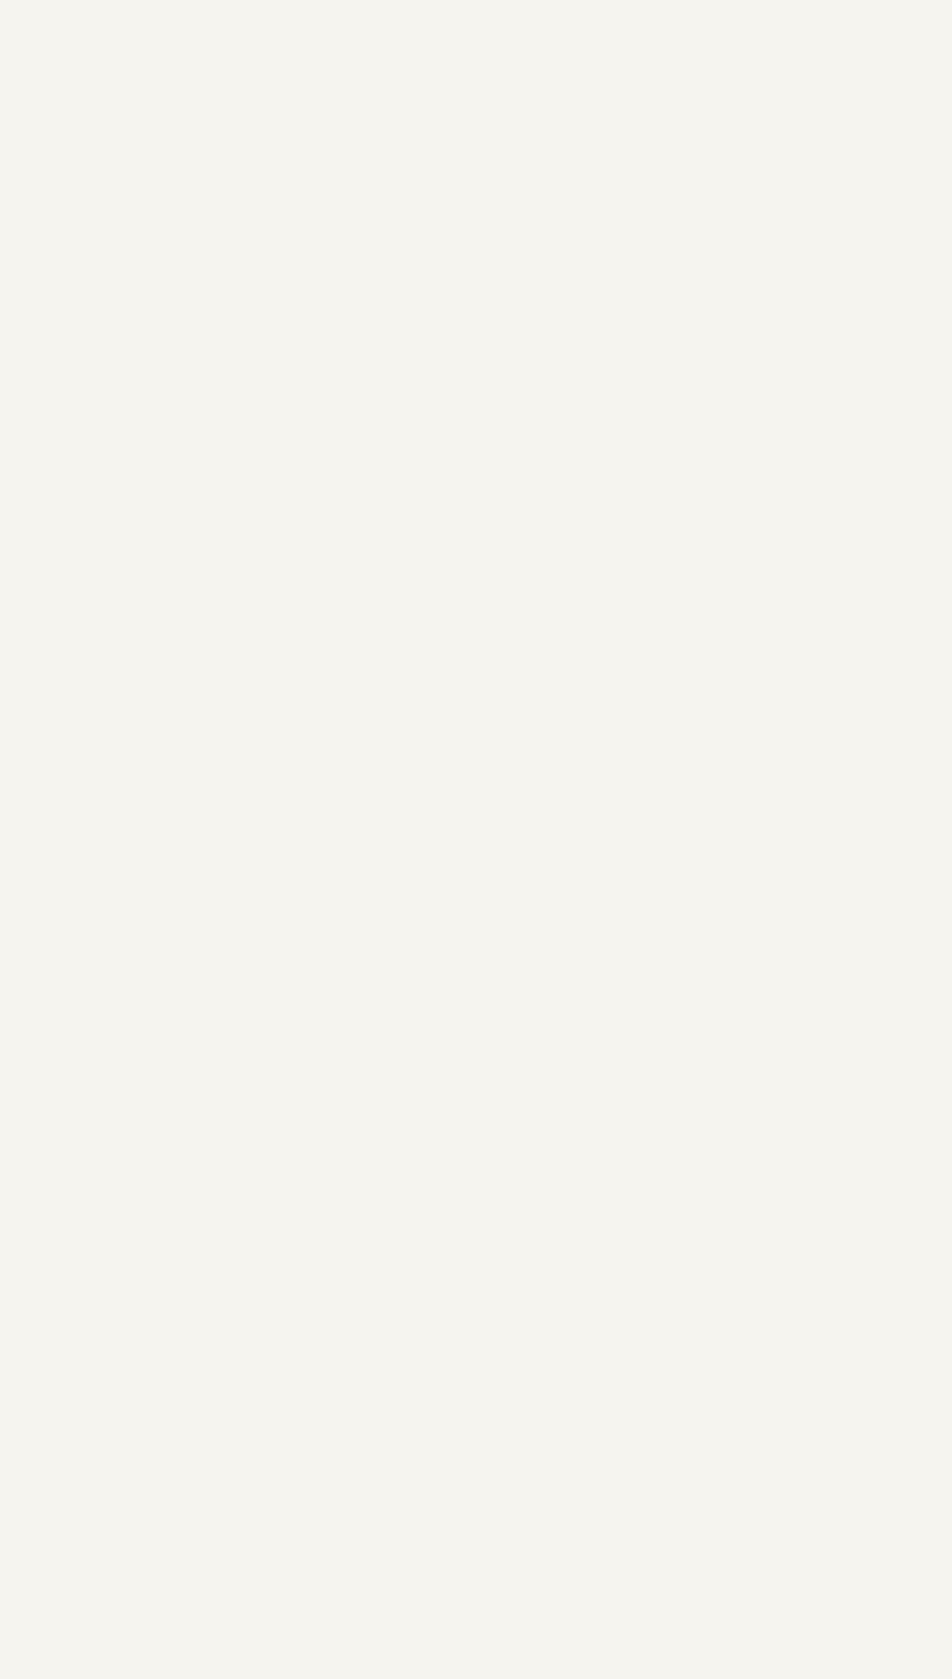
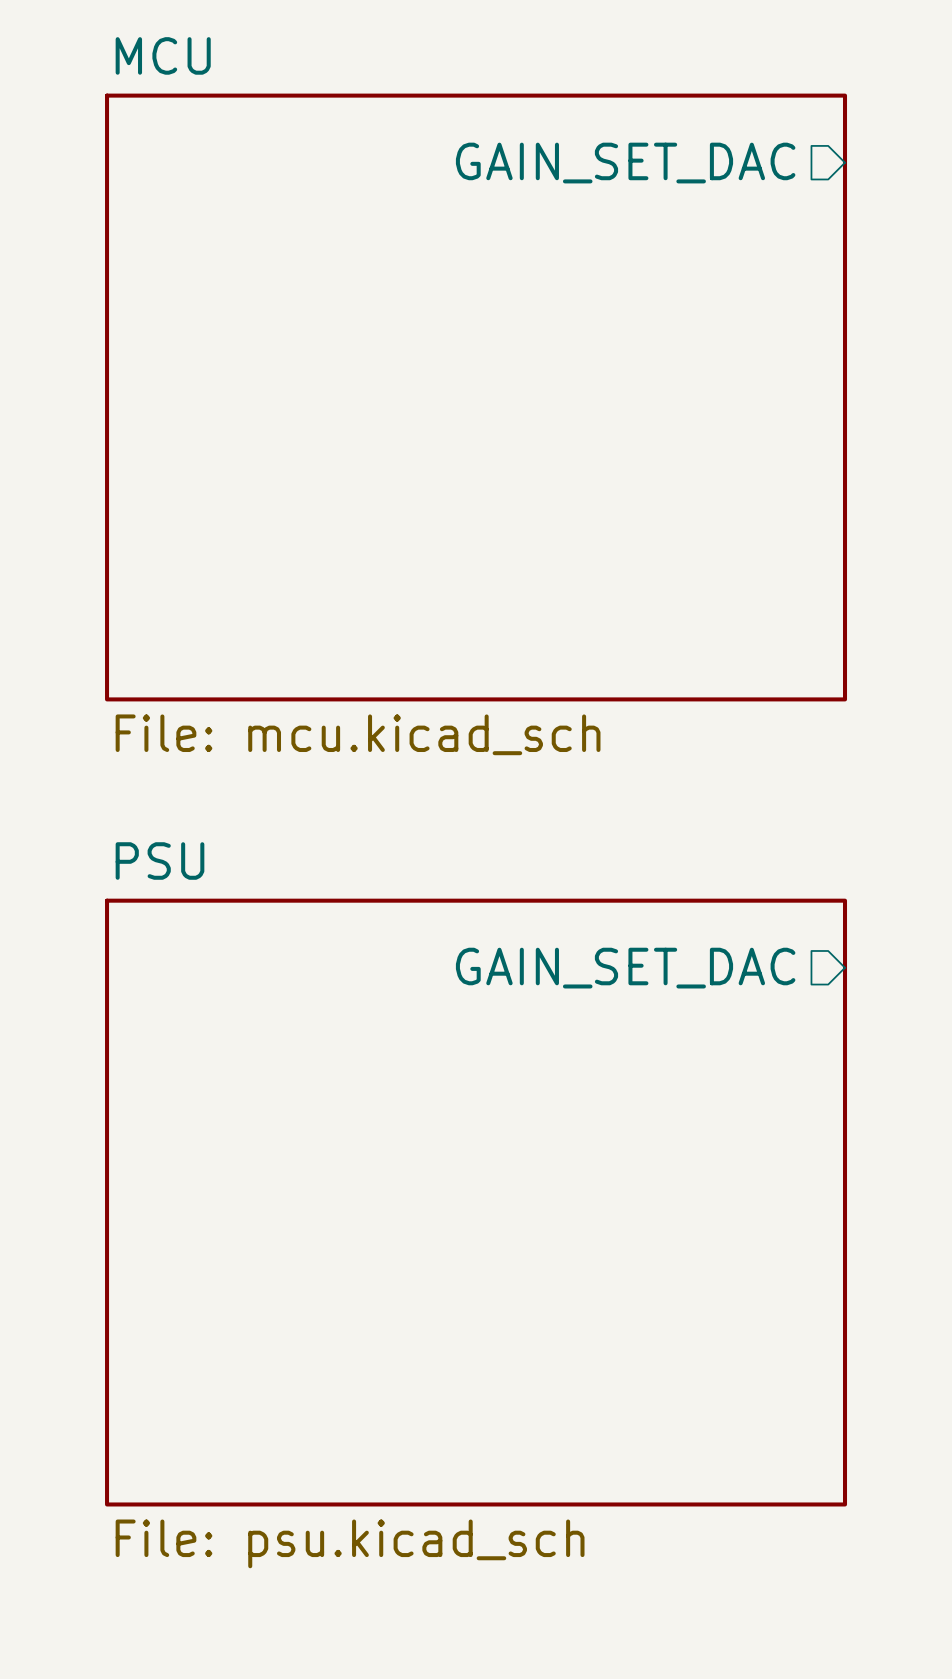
sheet pin: none -> GAIN_SET_DAC (625, 163)
sheet MCU: none -> File: mcu.kicad_sch (476, 397)
sheet pin: none -> GAIN_SET_DAC (625, 968)
sheet PSU: none -> File: psu.kicad_sch (476, 1202)

